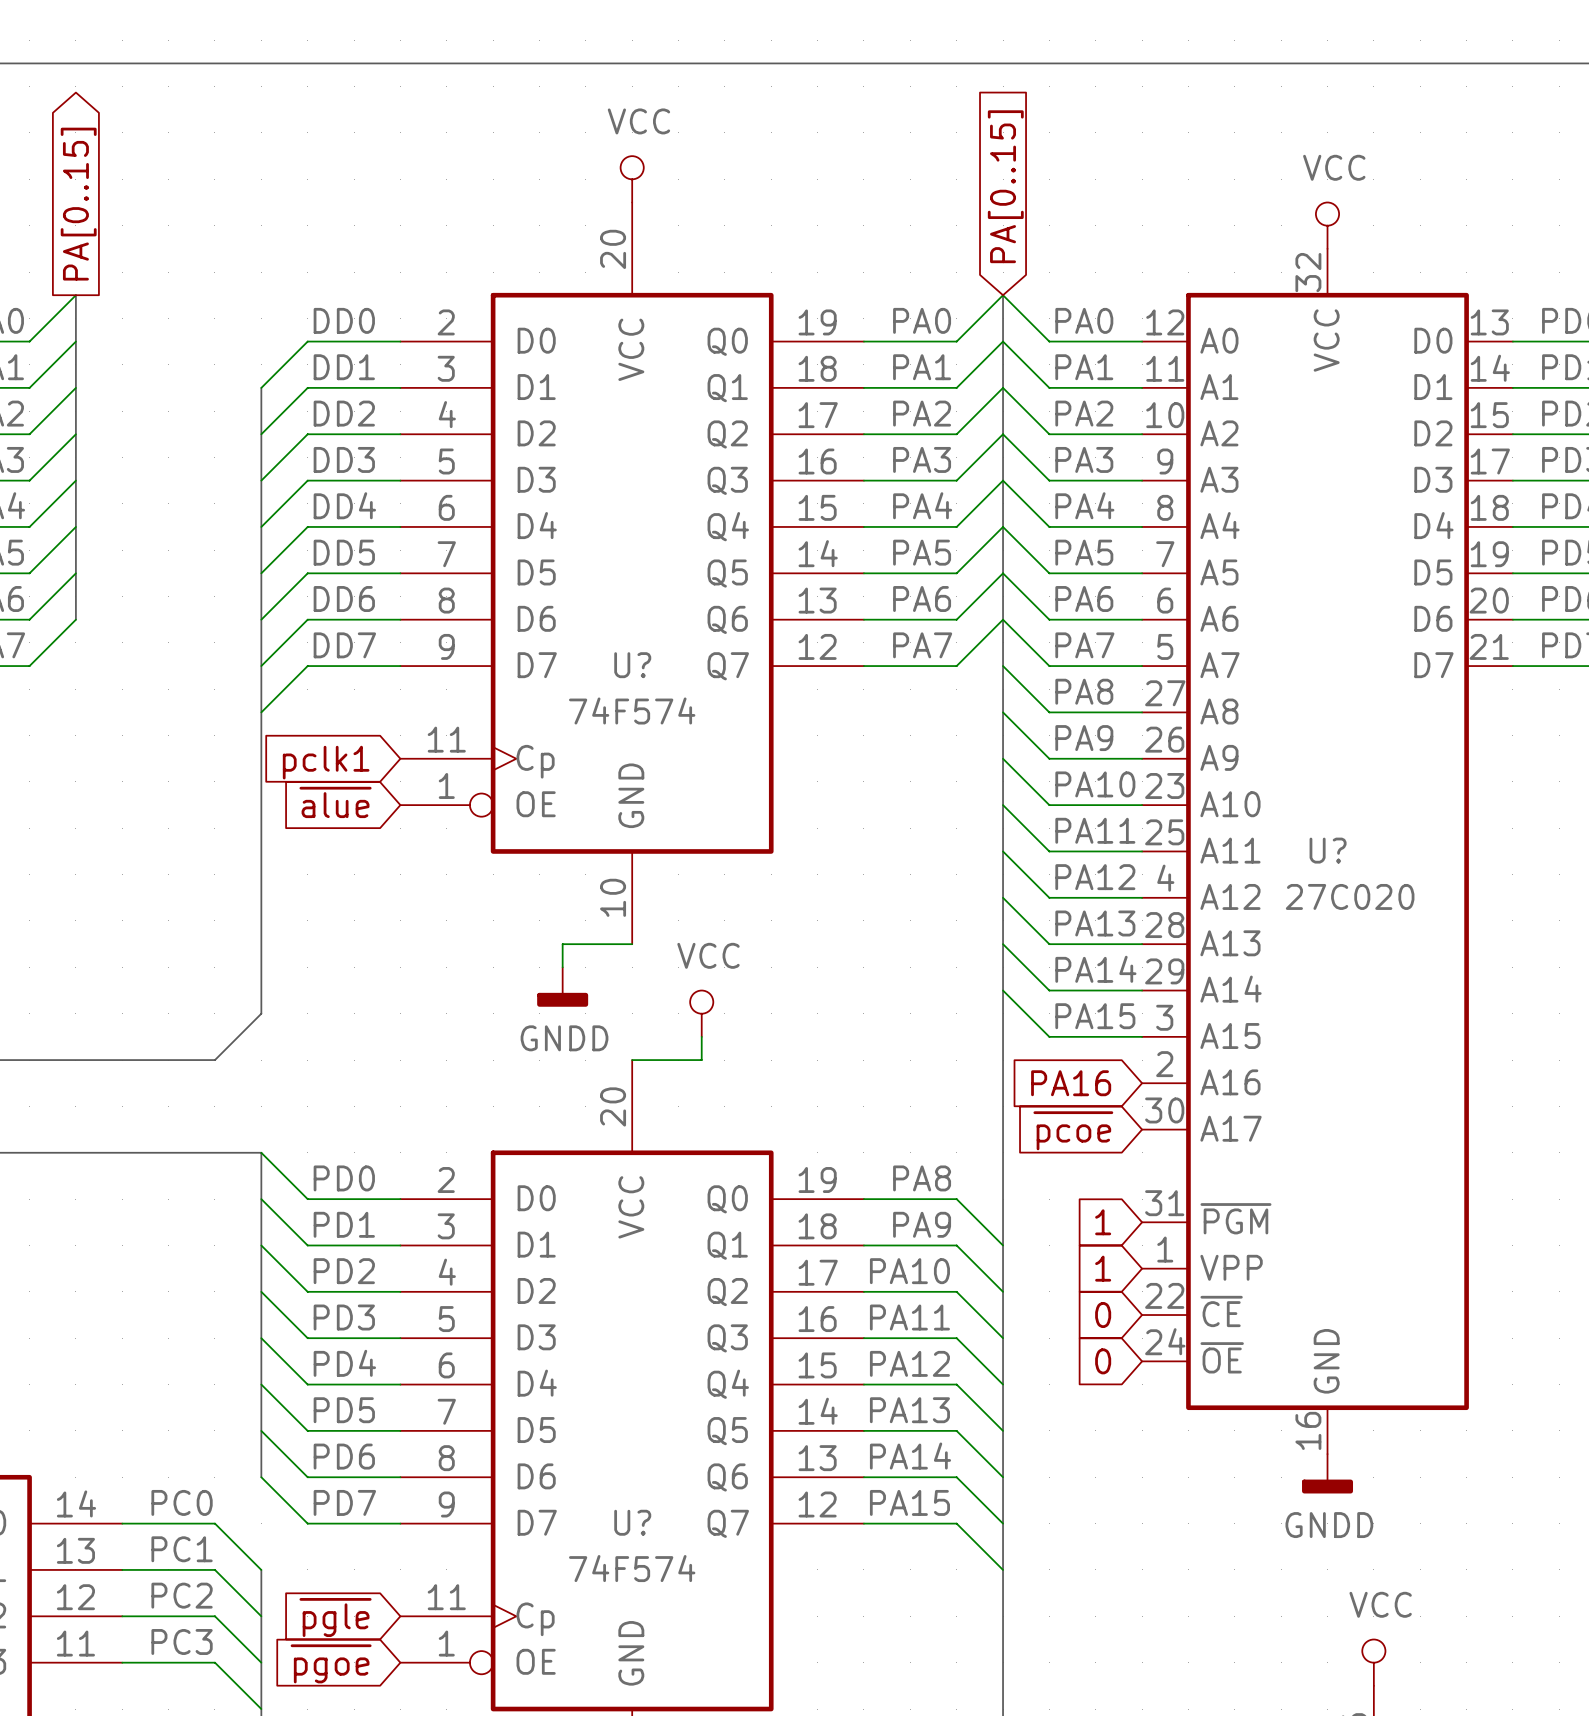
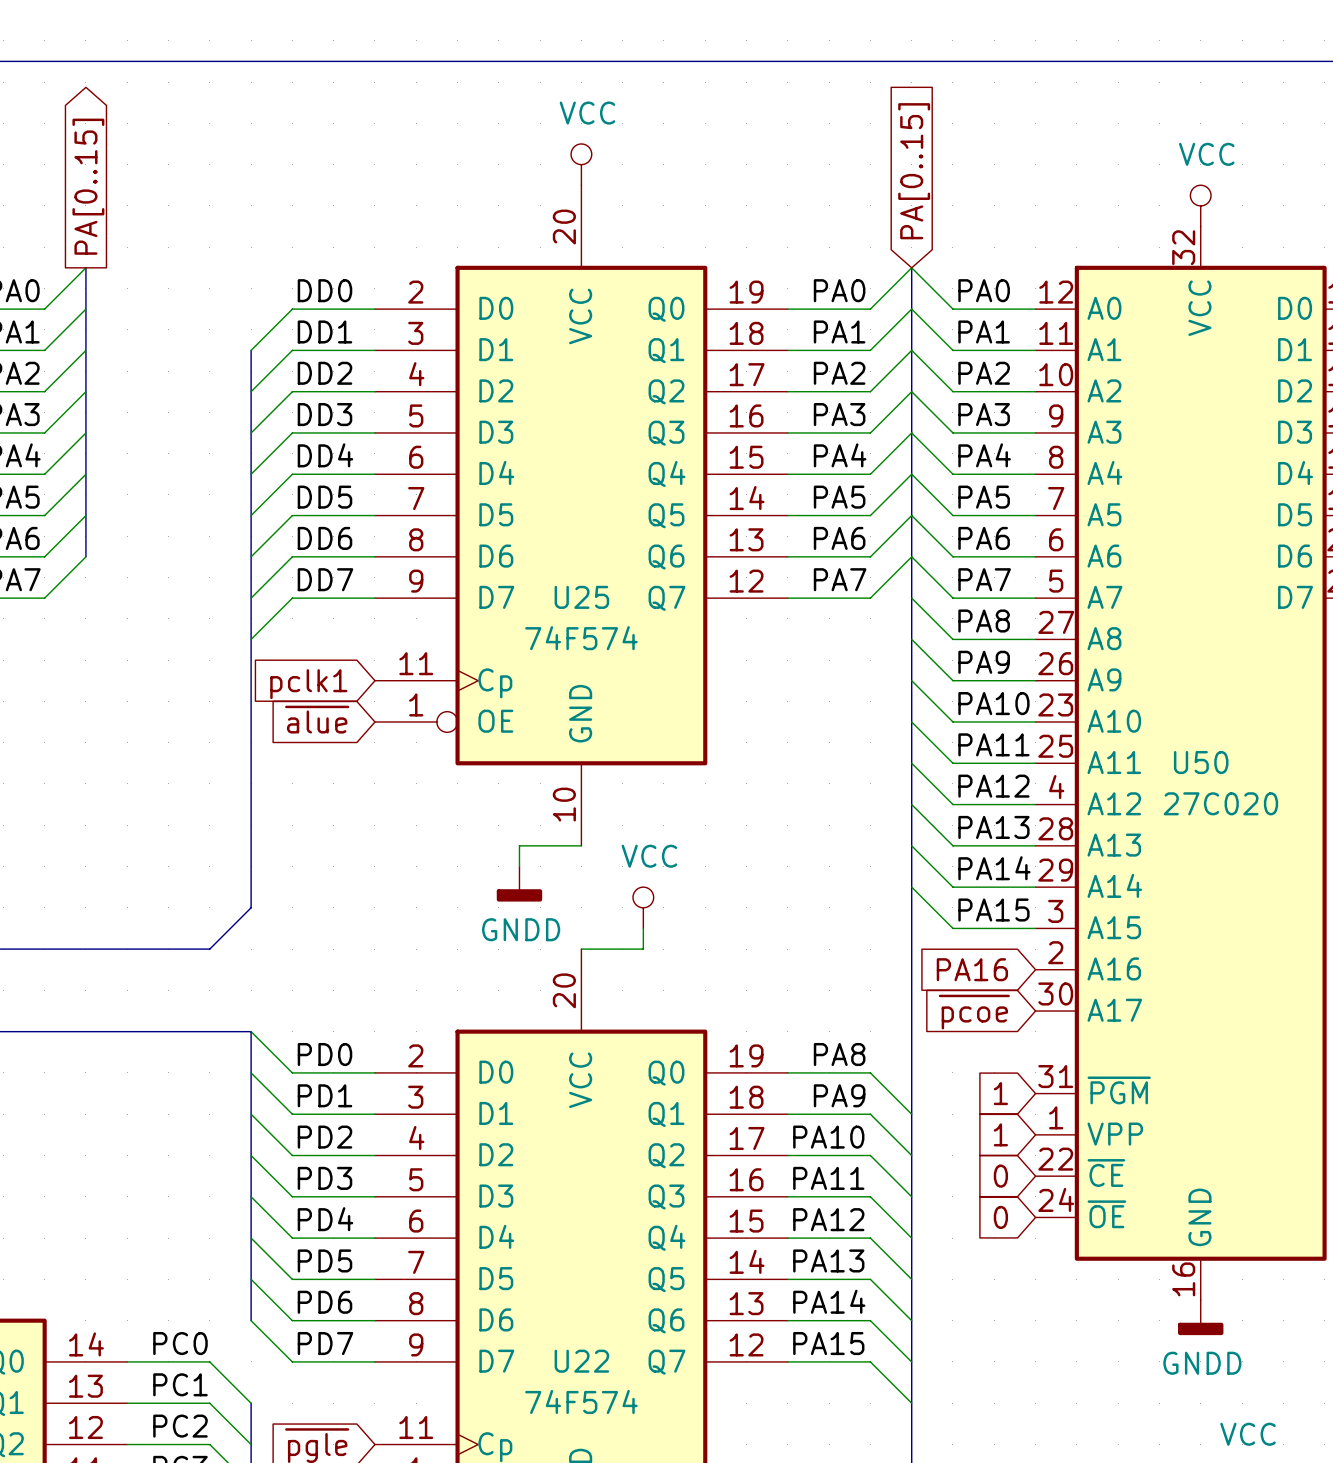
U? name: U? (632, 665) -> U25 (581, 597)
U? name: U? (1328, 850) -> U50 (1201, 762)
U? name: U? (632, 1522) -> U22 (581, 1361)

